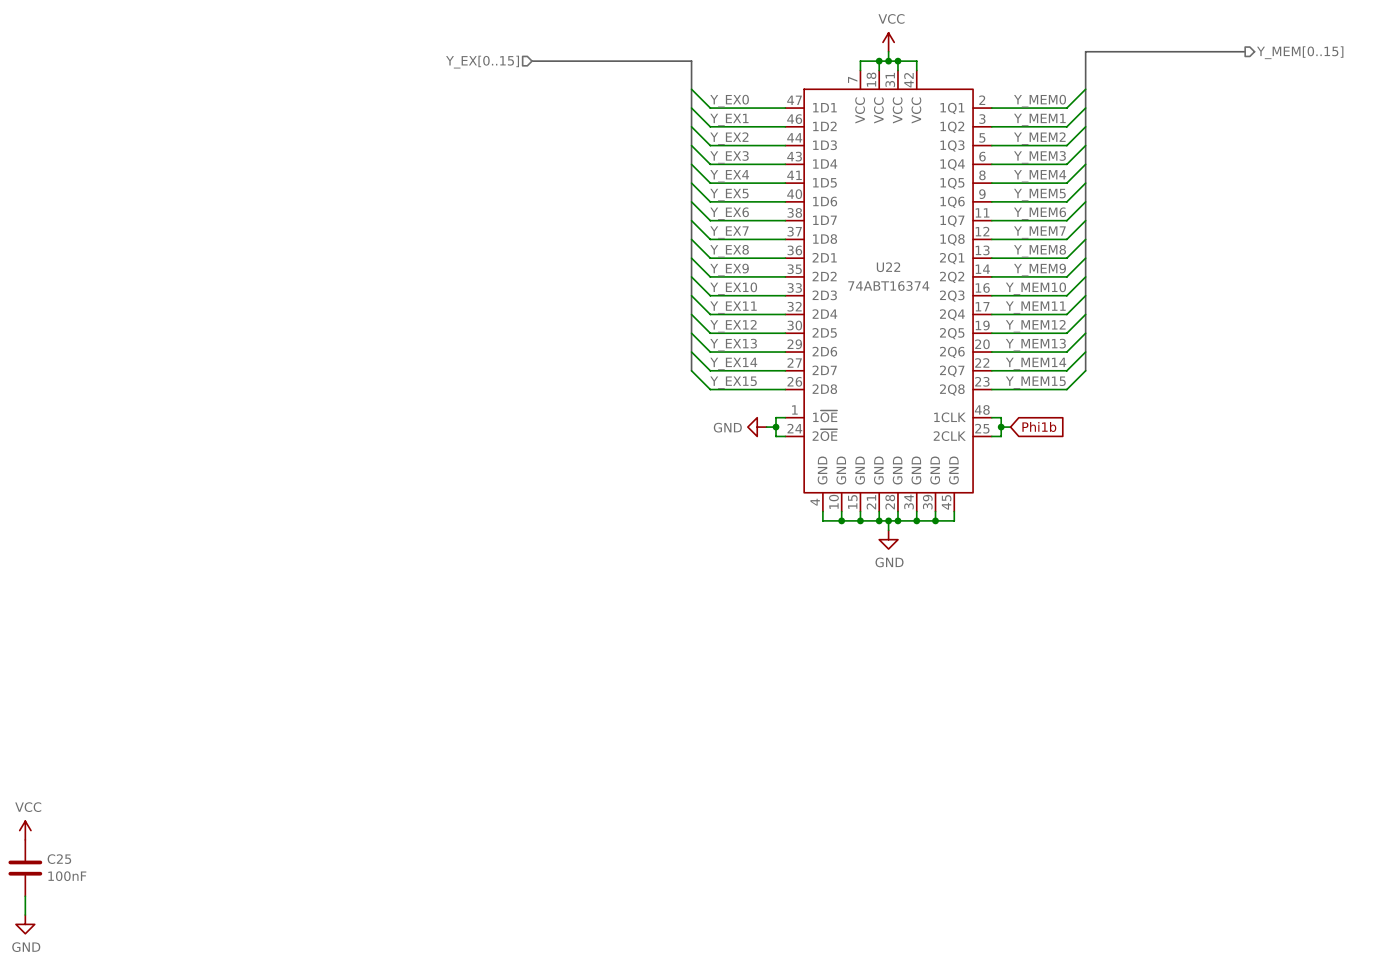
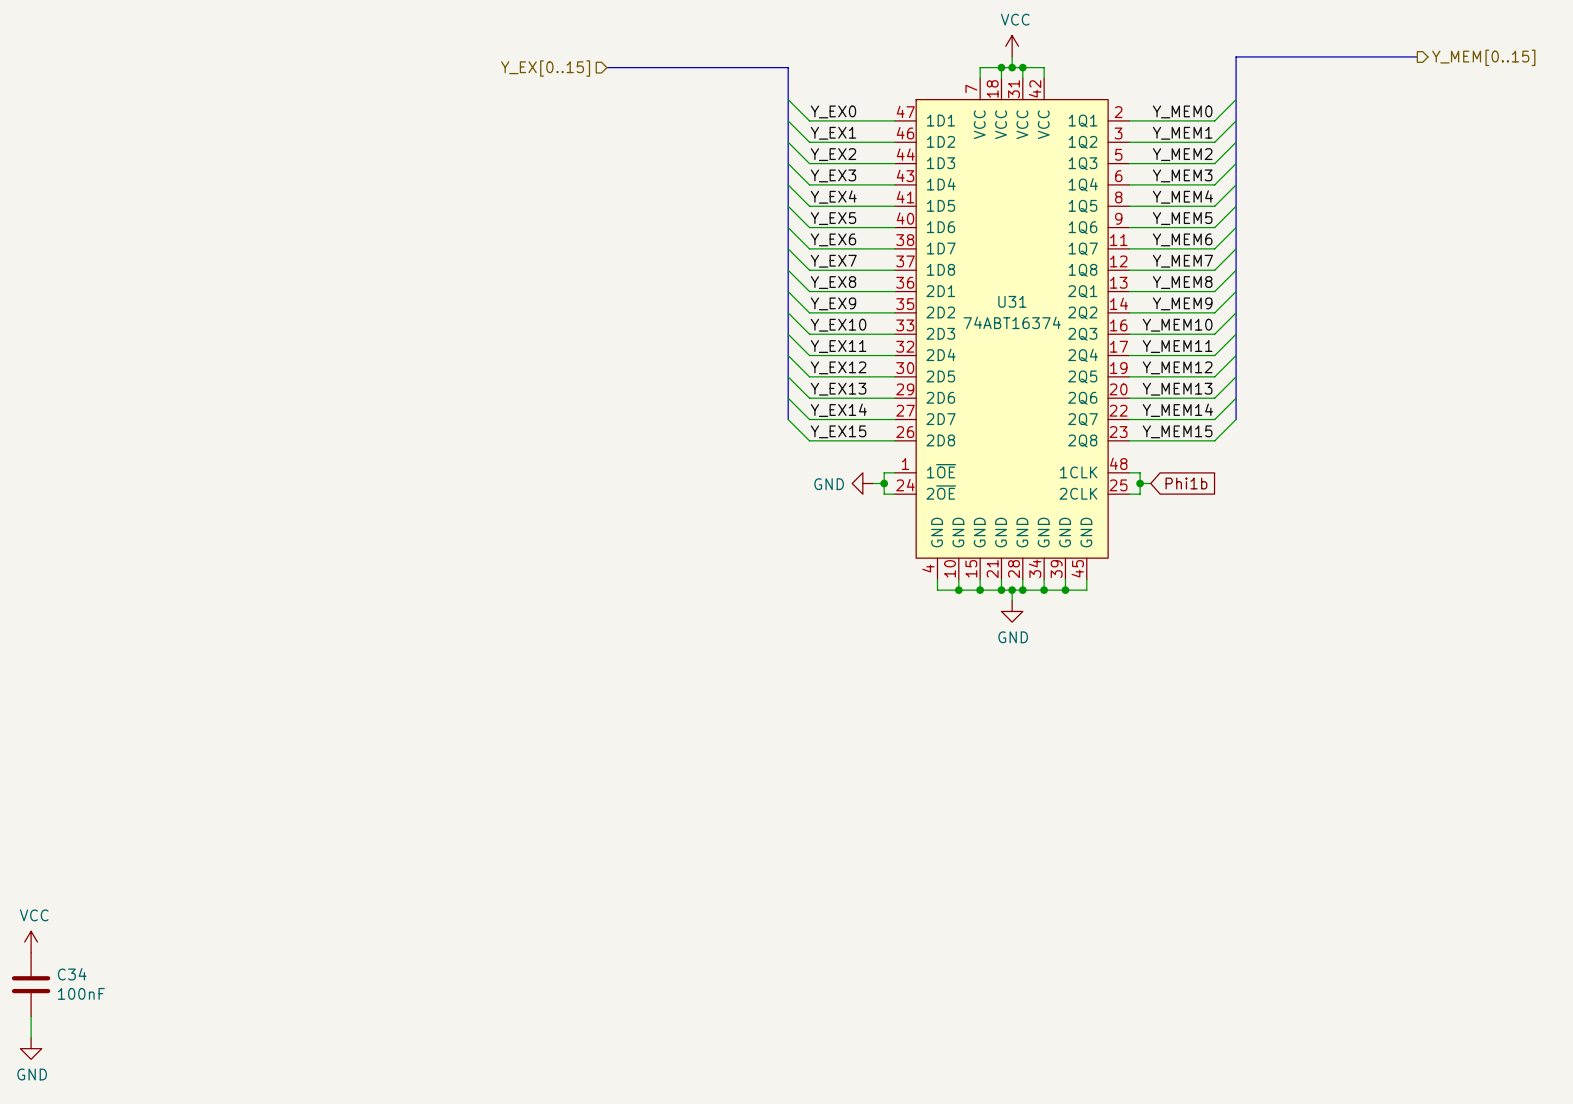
U22 name: U22 (888, 267) -> U31 (1012, 301)
C25 name: C25 (59, 859) -> C34 (72, 974)

